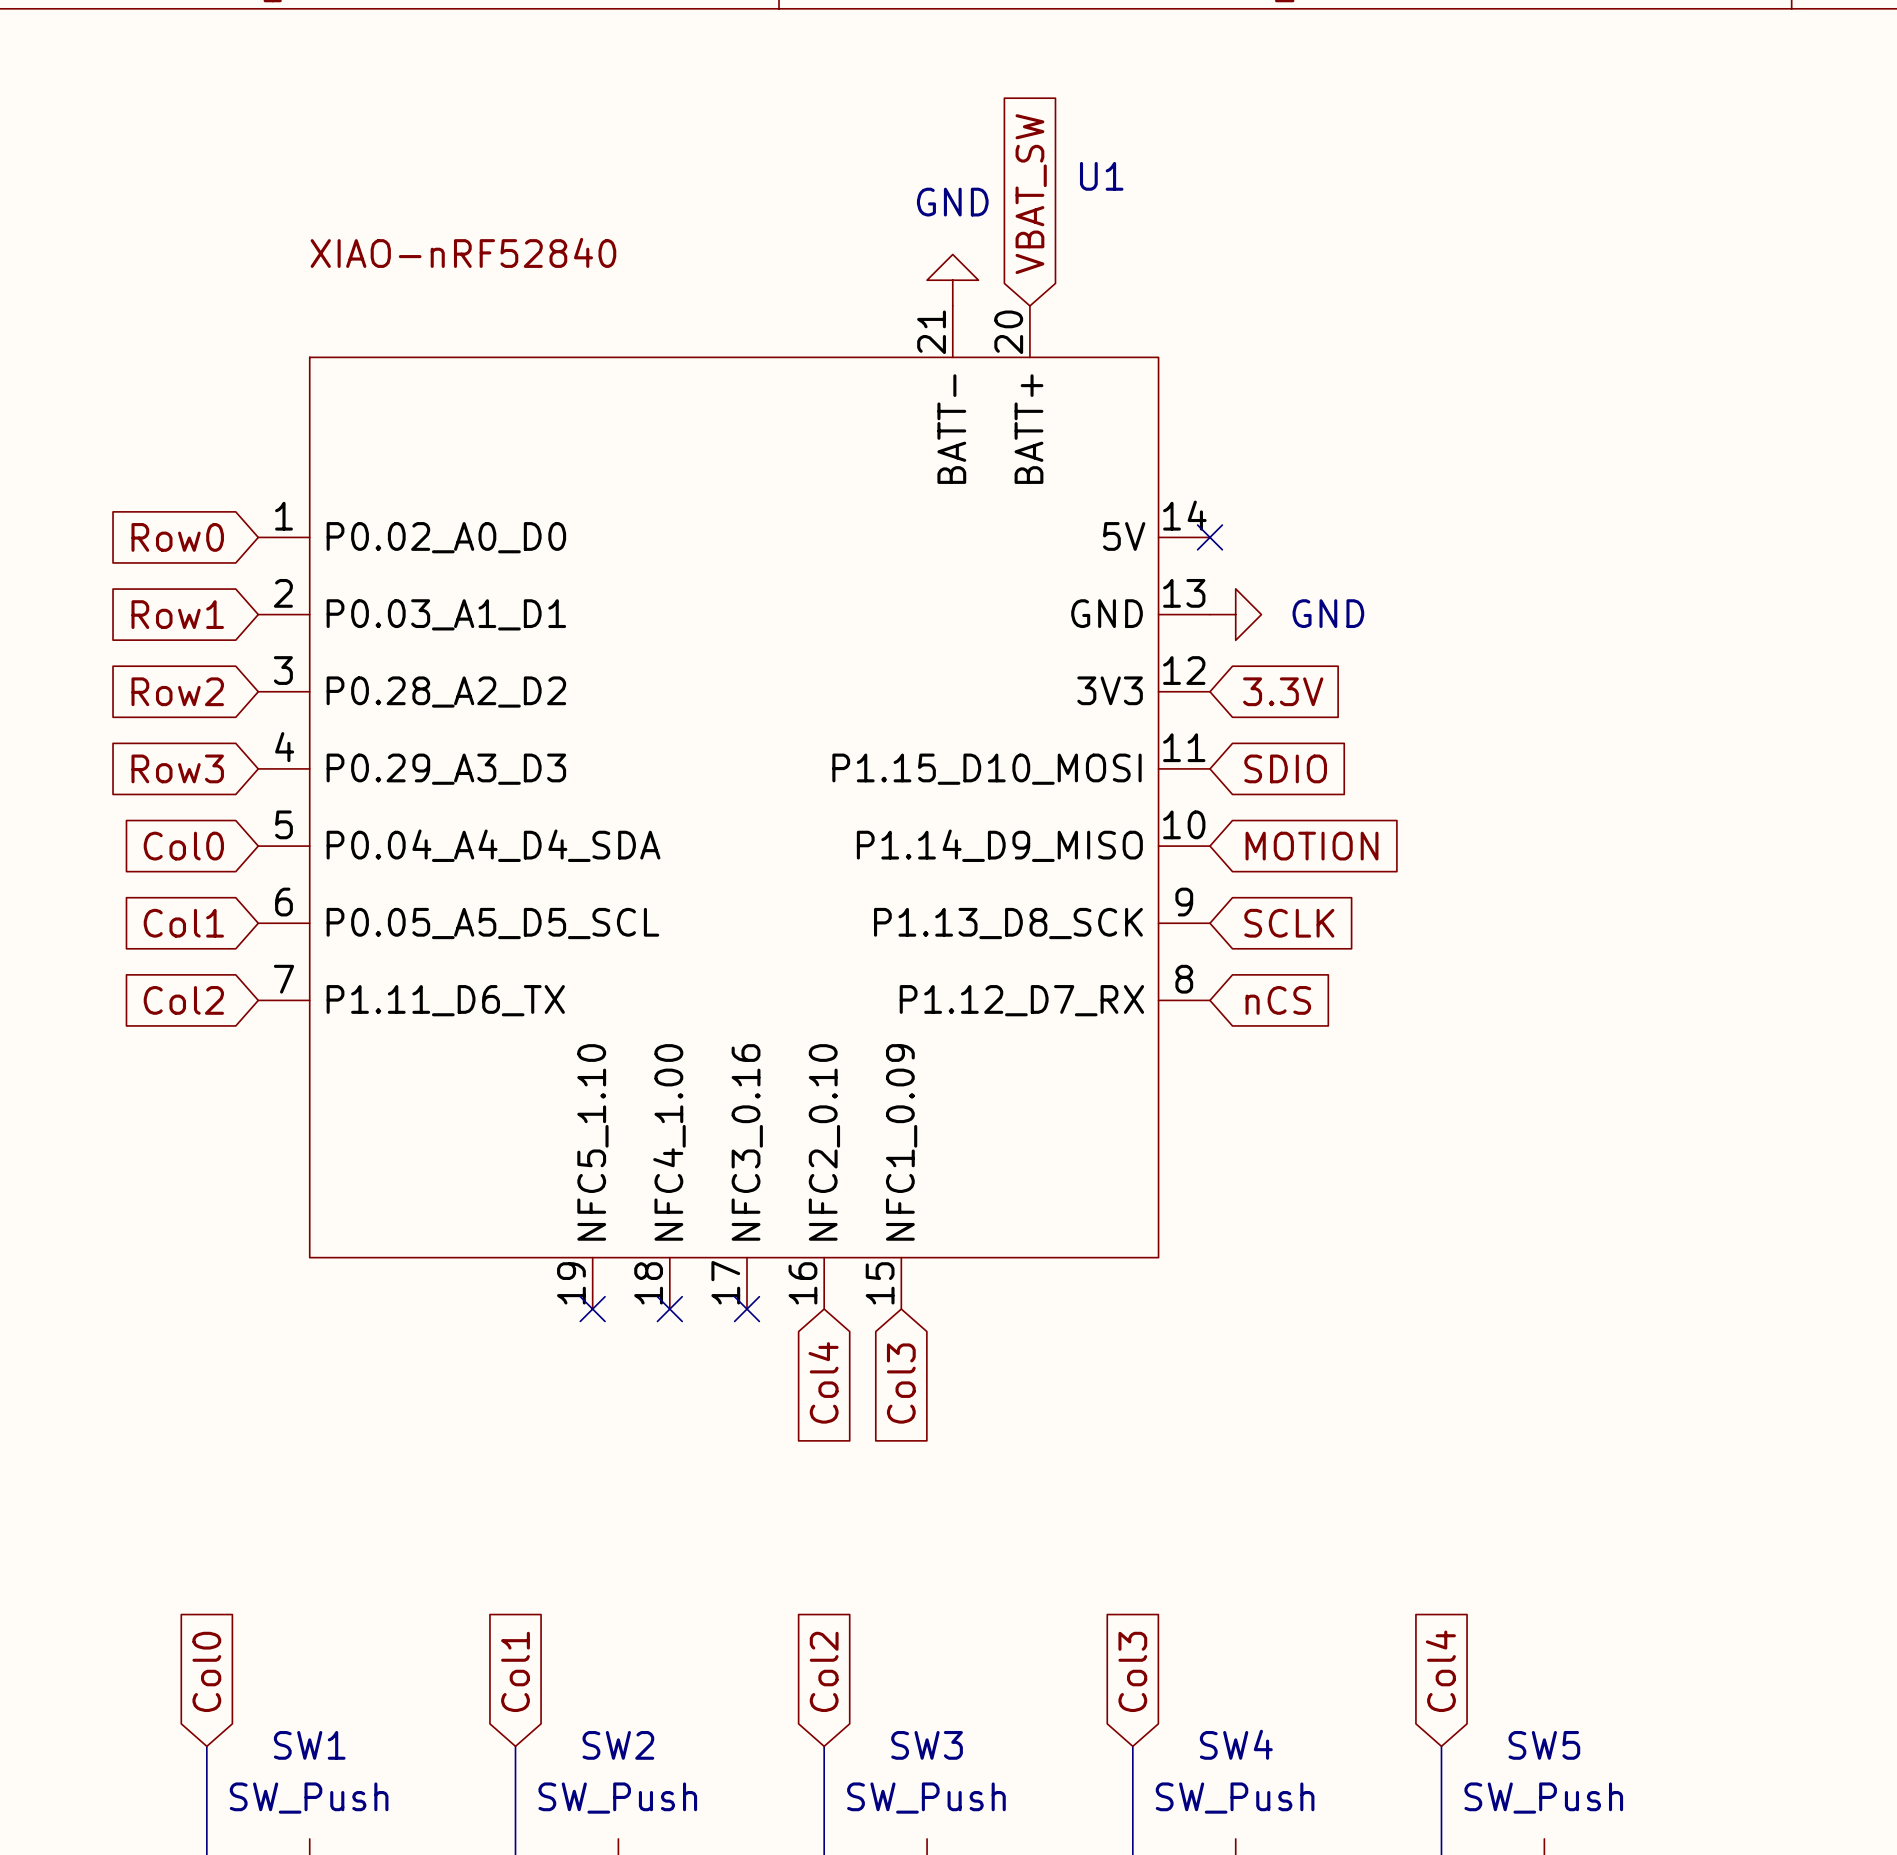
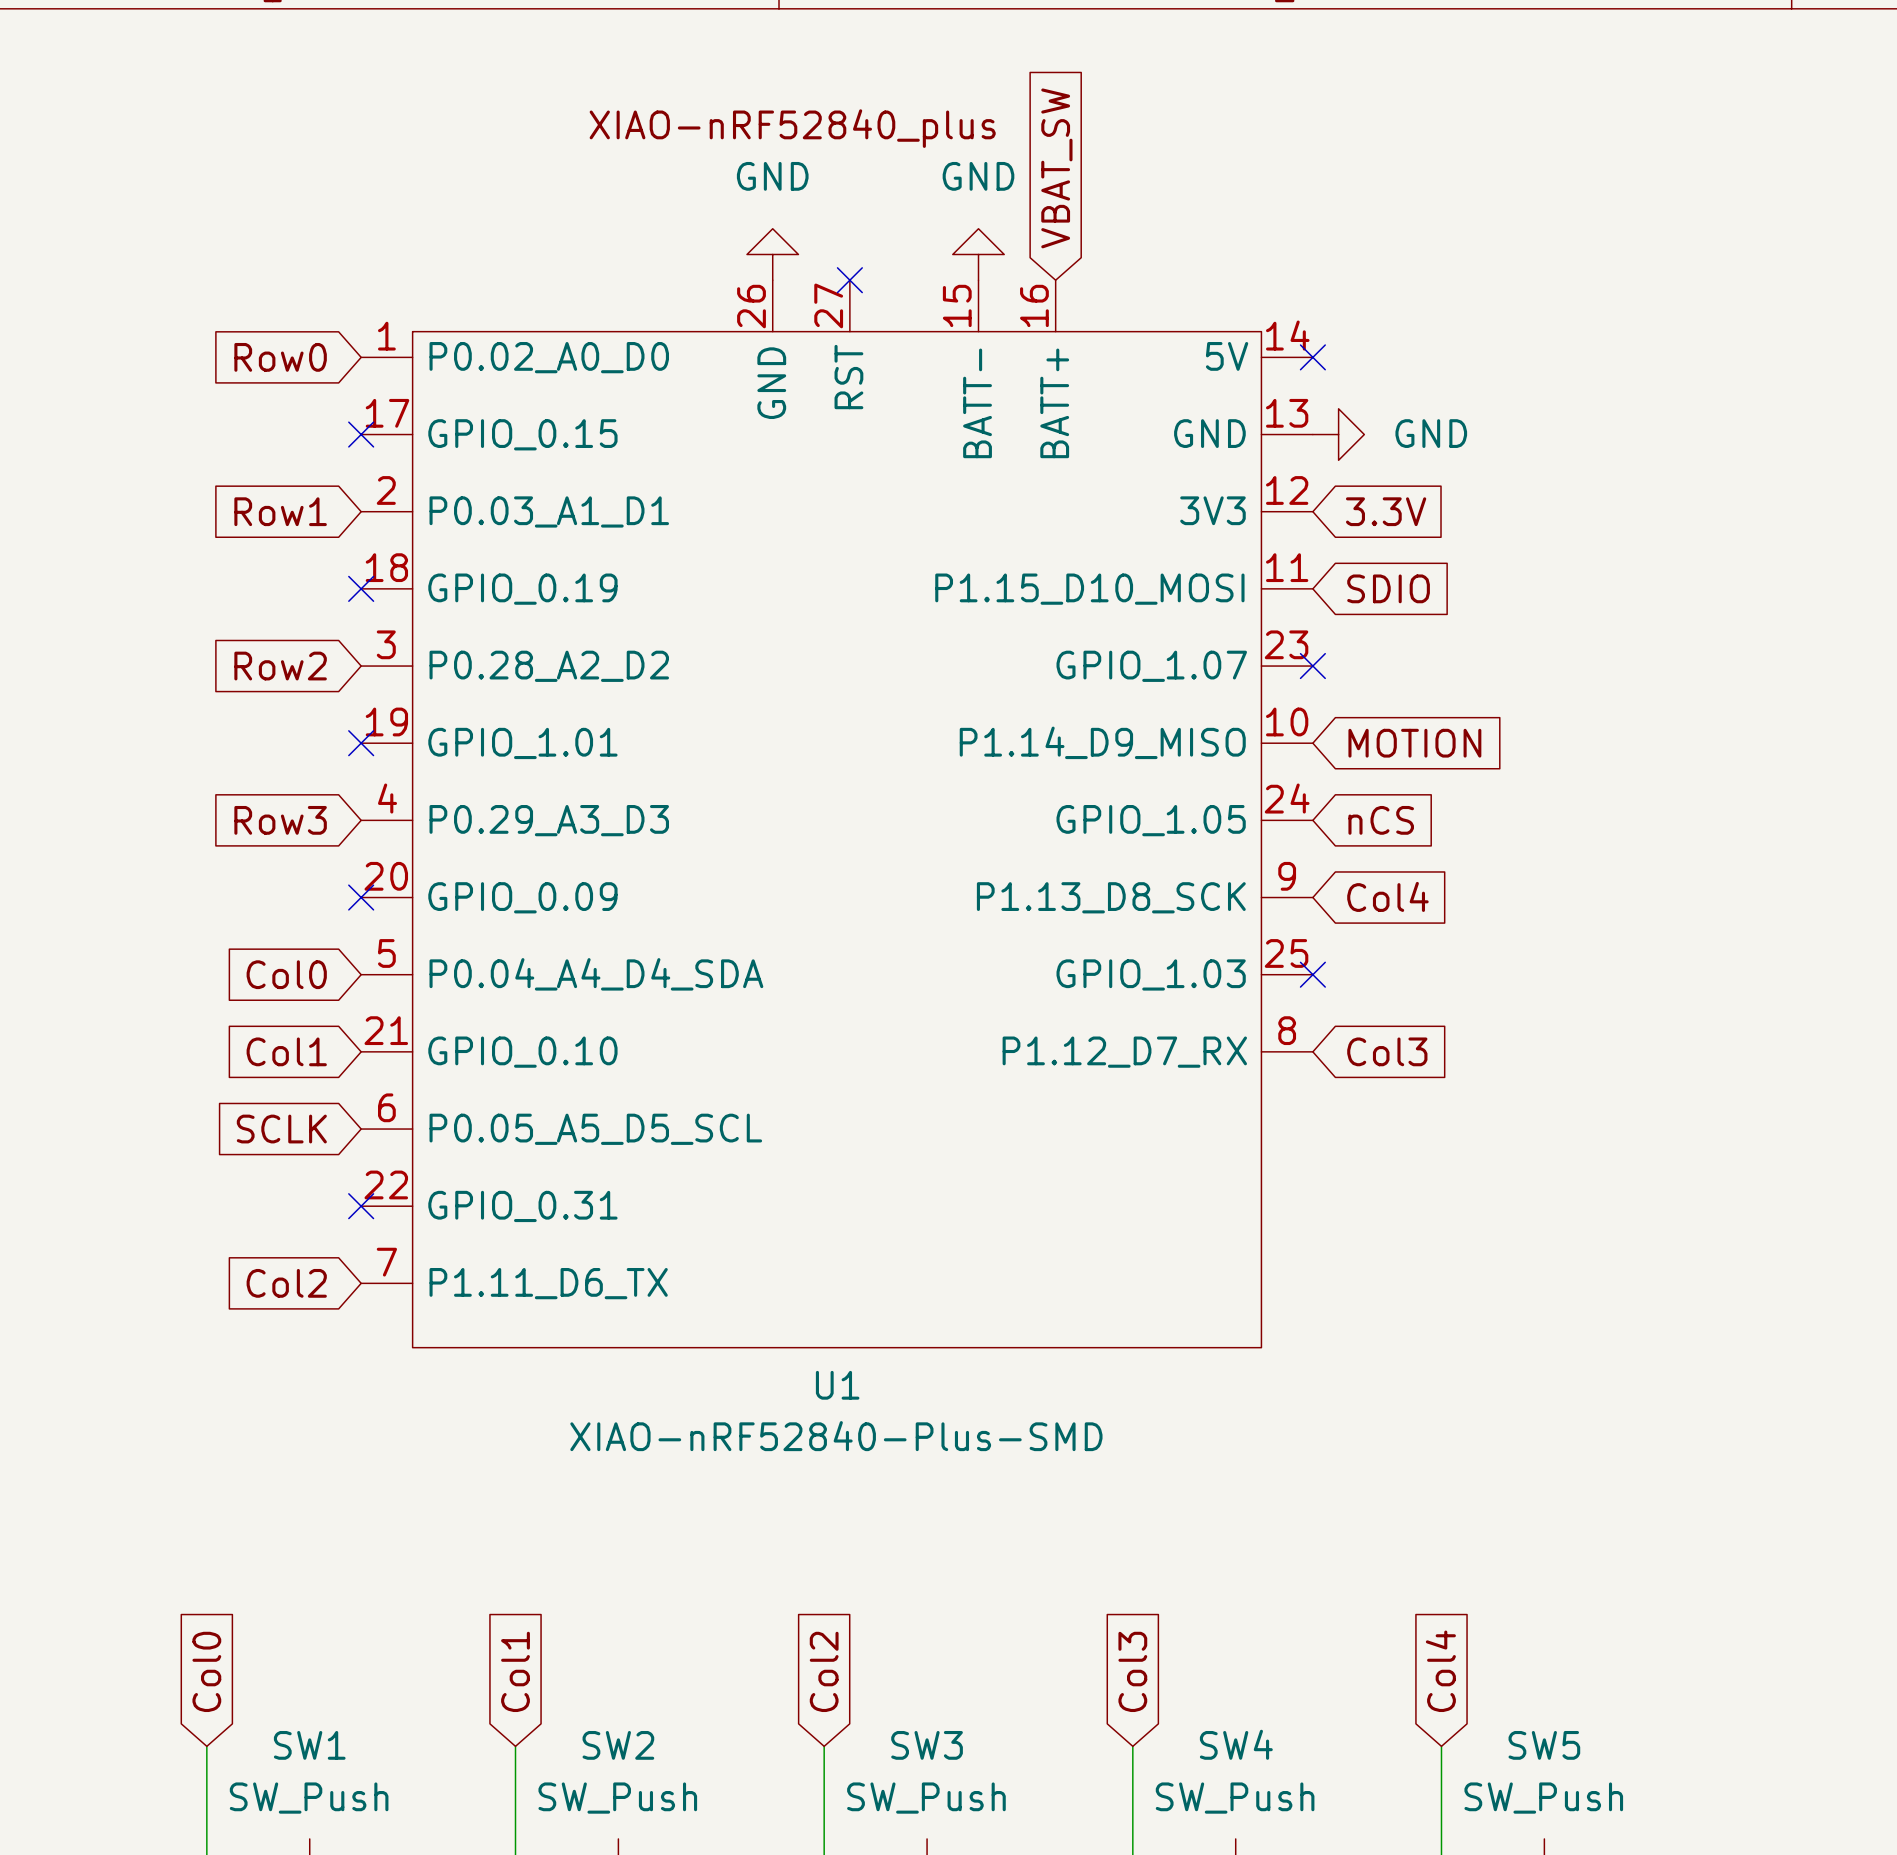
U1 name position: U1 (1101, 176) -> U1 (837, 1385)
global label position: VBAT_SW (1031, 194) -> VBAT_SW (1056, 168)
power symbol: none -> GND (772, 254)
no-connect mark: none -> (849, 280)
power symbol position: GND (952, 280) -> GND (978, 254)
U1 symbol: [258, 305, 1210, 1310] -> [361, 280, 1313, 1348]
no-connect mark: none -> (1312, 357)
no-connect mark: none -> (361, 434)
global label position: Row0 (177, 537) -> Row0 (280, 357)
no-connect mark: (1209, 537) -> none
no-connect mark: none -> (361, 588)
global label position: Row1 (177, 614) -> Row1 (280, 511)
power symbol position: GND (1235, 614) -> GND (1338, 434)
no-connect mark: none -> (1312, 666)
global label position: Row2 (177, 691) -> Row2 (280, 666)
global label position: 3.3V (1283, 691) -> 3.3V (1386, 511)
no-connect mark: none -> (361, 743)
global label position: Row3 (177, 768) -> Row3 (280, 820)
global label position: SDIO (1285, 768) -> SDIO (1388, 588)
global label position: Col0 (183, 846) -> Col0 (286, 974)
global label position: MOTION (1312, 846) -> MOTION (1414, 743)
global label: none -> Col4 (1387, 896)
no-connect mark: none -> (361, 897)
global label position: Col1 (183, 923) -> Col1 (286, 1051)
global label: SCLK (1289, 923) -> none
no-connect mark: none -> (1312, 974)
global label position: Col2 (183, 1000) -> Col2 (286, 1283)
global label position: nCS (1278, 1000) -> nCS (1381, 820)
global label: none -> SCLK (281, 1129)
no-connect mark: none -> (361, 1206)
no-connect mark: (592, 1309) -> none
no-connect mark: (669, 1309) -> none
no-connect mark: (747, 1309) -> none
global label: Col4 (823, 1382) -> none
global label rotation: 0° (901, 1383) -> 90° counterclockwise (1387, 1051)
global label position: Col3 (901, 1383) -> Col3 (1387, 1051)
U1 value: none -> XIAO-nRF52840-Plus-SMD (836, 1436)

